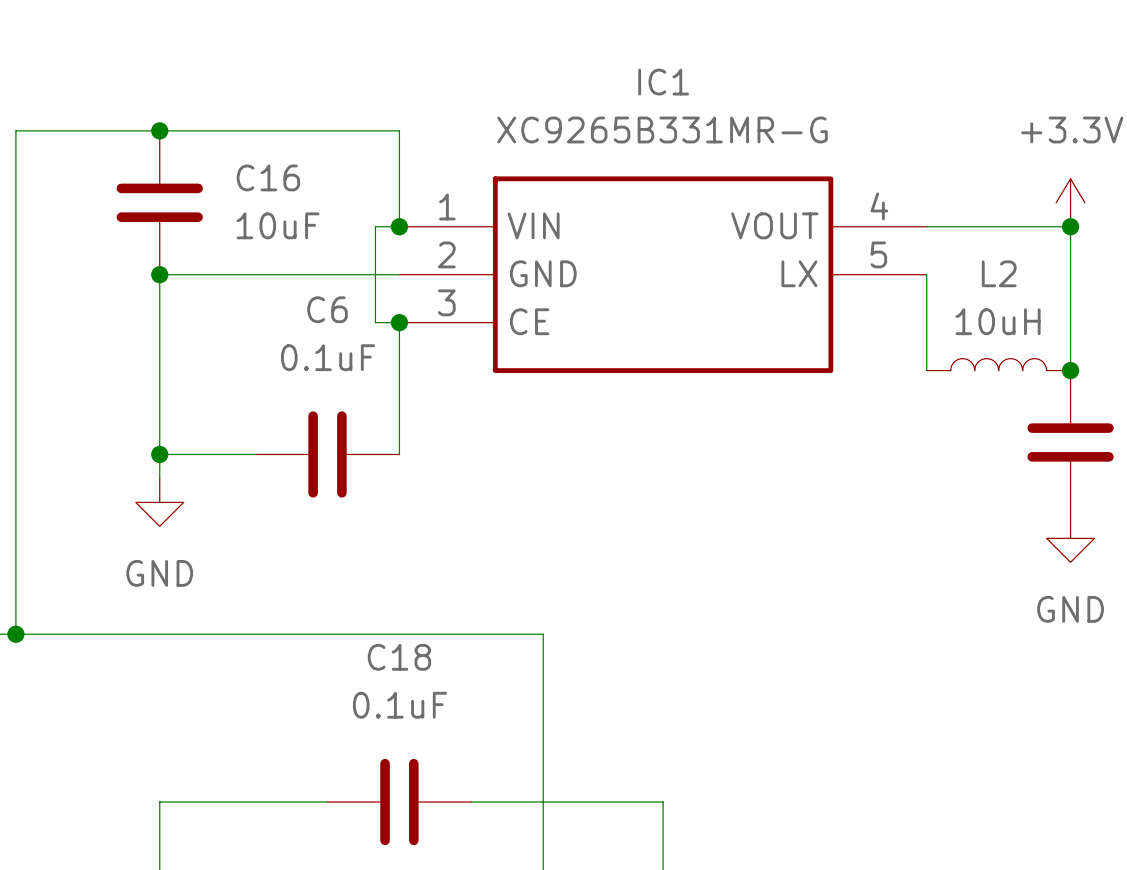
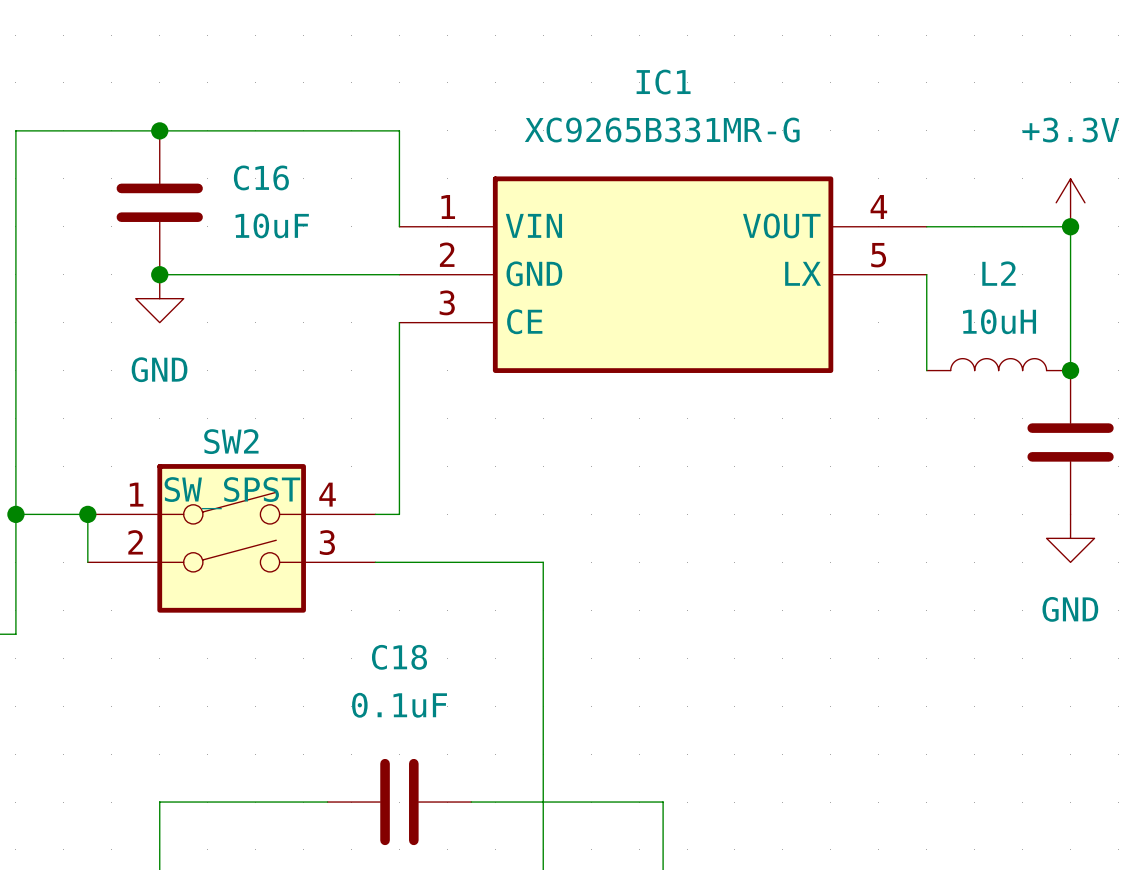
wire: (399, 226) (375, 226) (375, 322) (399, 322) -> none
junction: (399, 226) -> none
wire: (159, 274) (159, 478) -> none
junction: (399, 322) -> none
wire: (159, 454) (255, 454) -> none
junction: (159, 454) -> none
C6: 0.1uF (327, 454) -> none
wire: none -> (399, 454) (399, 514) (375, 514)
power symbol position: GND (159, 502) -> GND (159, 298)
wire: none -> (15, 514) (87, 514) (87, 562)
junction: none -> (15, 514)
junction: none -> (87, 514)
SW2: none -> SW_SPST (231, 538)
wire: (15, 634) (543, 634) -> (375, 562) (543, 562) (543, 634)
junction: (15, 634) -> none

